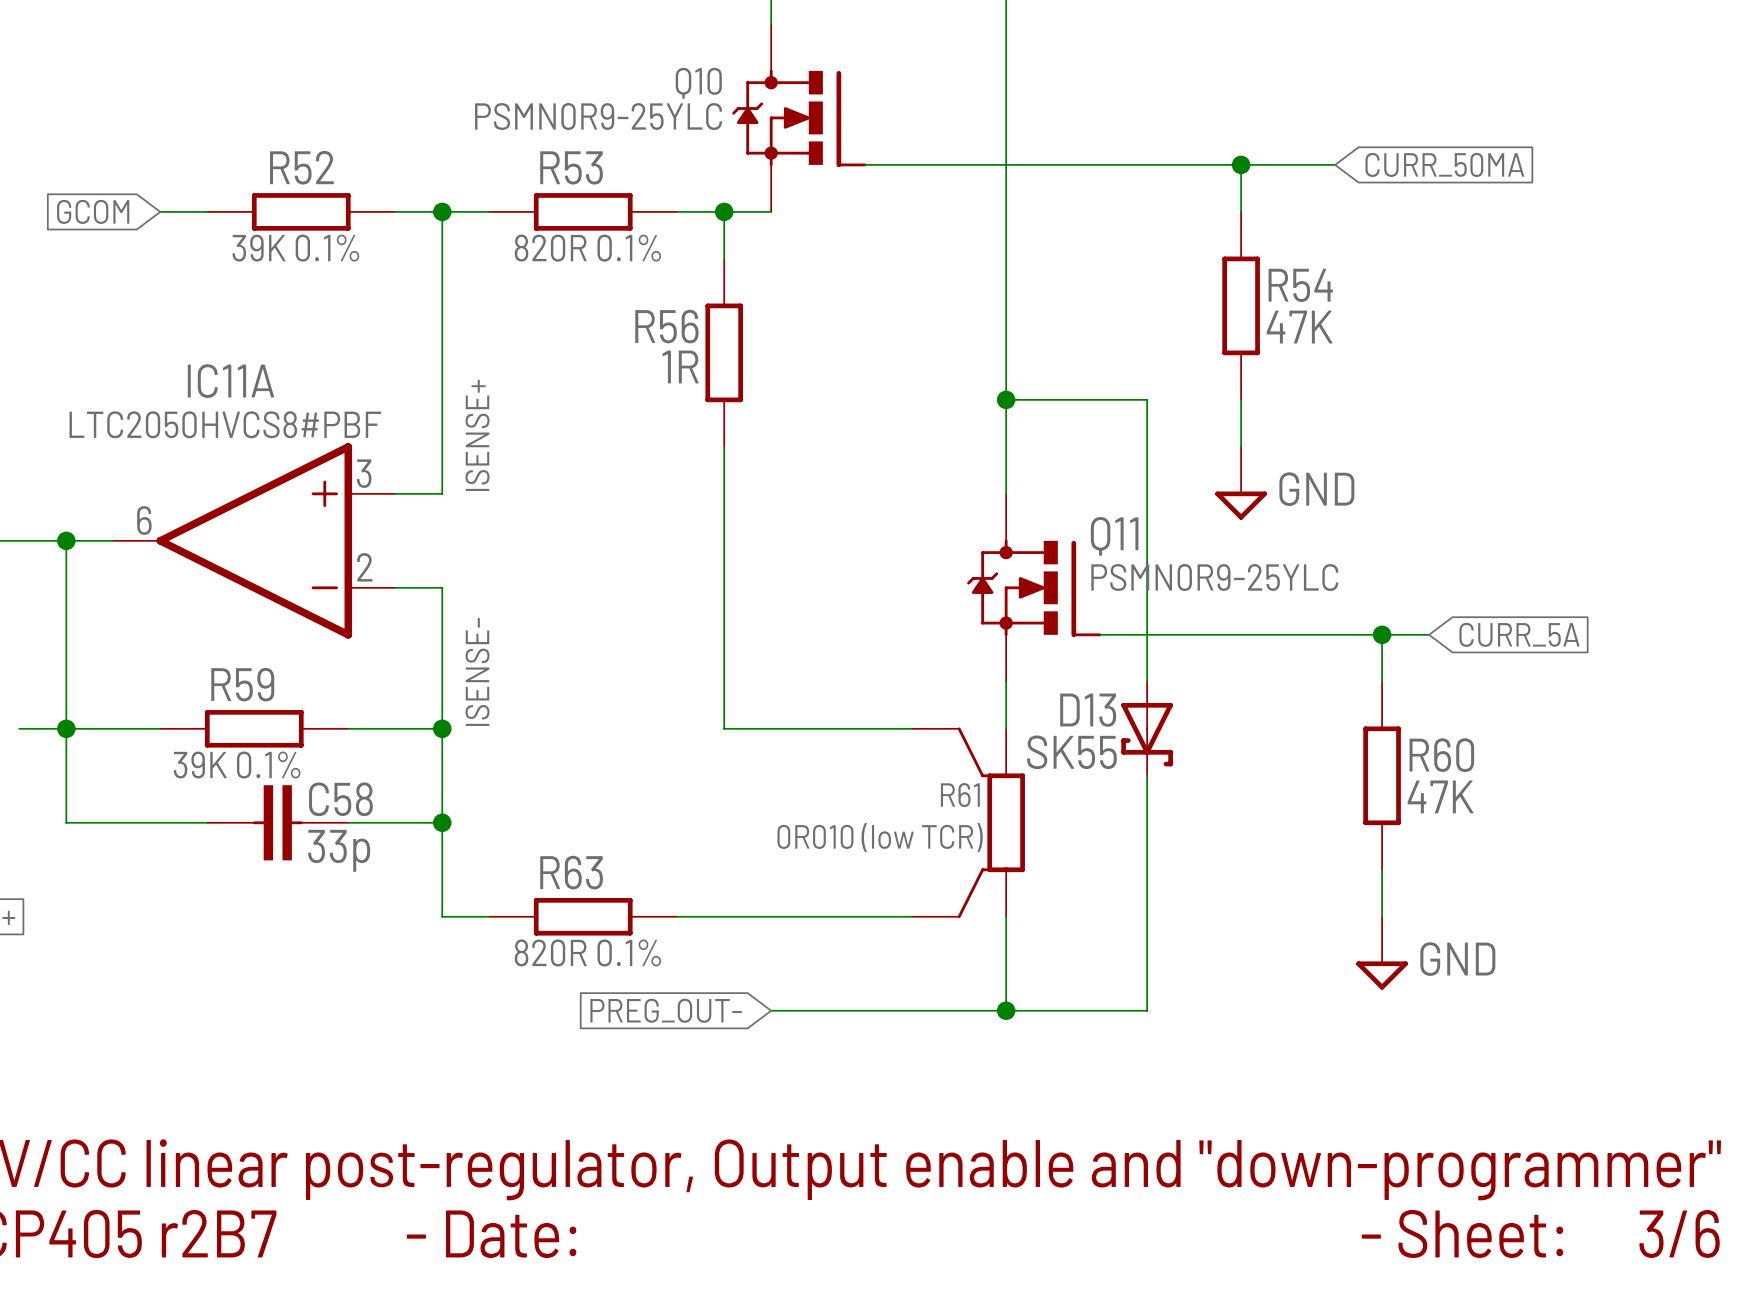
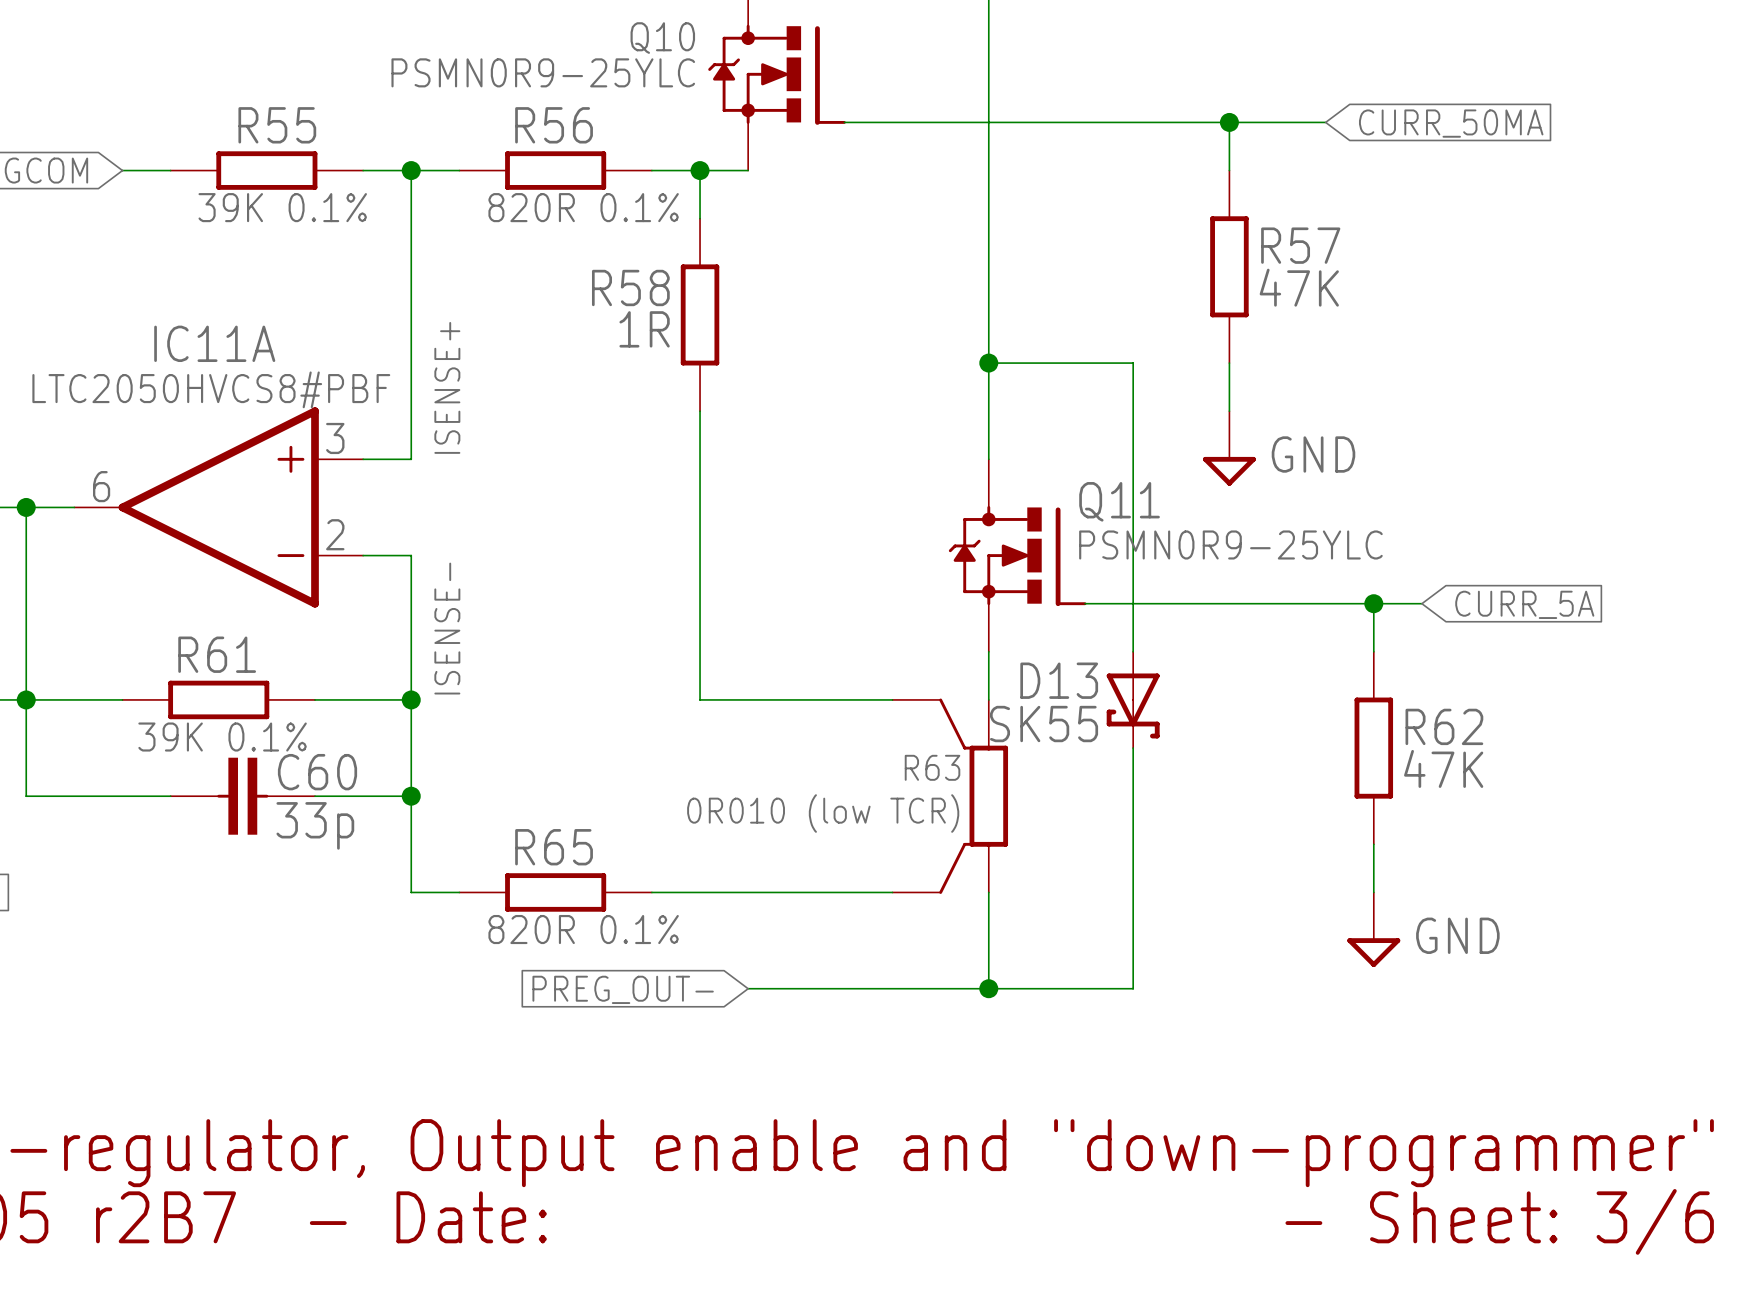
R52 name: R52 (301, 167) -> R55 (277, 125)
R53 name: R53 (571, 167) -> R56 (554, 125)
R54 name: R54 (1300, 285) -> R57 (1300, 245)
R56 name: R56 (666, 326) -> R58 (630, 287)
R59 name: R59 (242, 684) -> R61 (217, 654)
R60 name: R60 (1441, 755) -> R62 (1444, 726)
R61 name: R61 (960, 795) -> R63 (932, 767)
C58 name: C58 (340, 799) -> C60 (317, 772)
R63 name: R63 (571, 872) -> R65 (554, 847)

